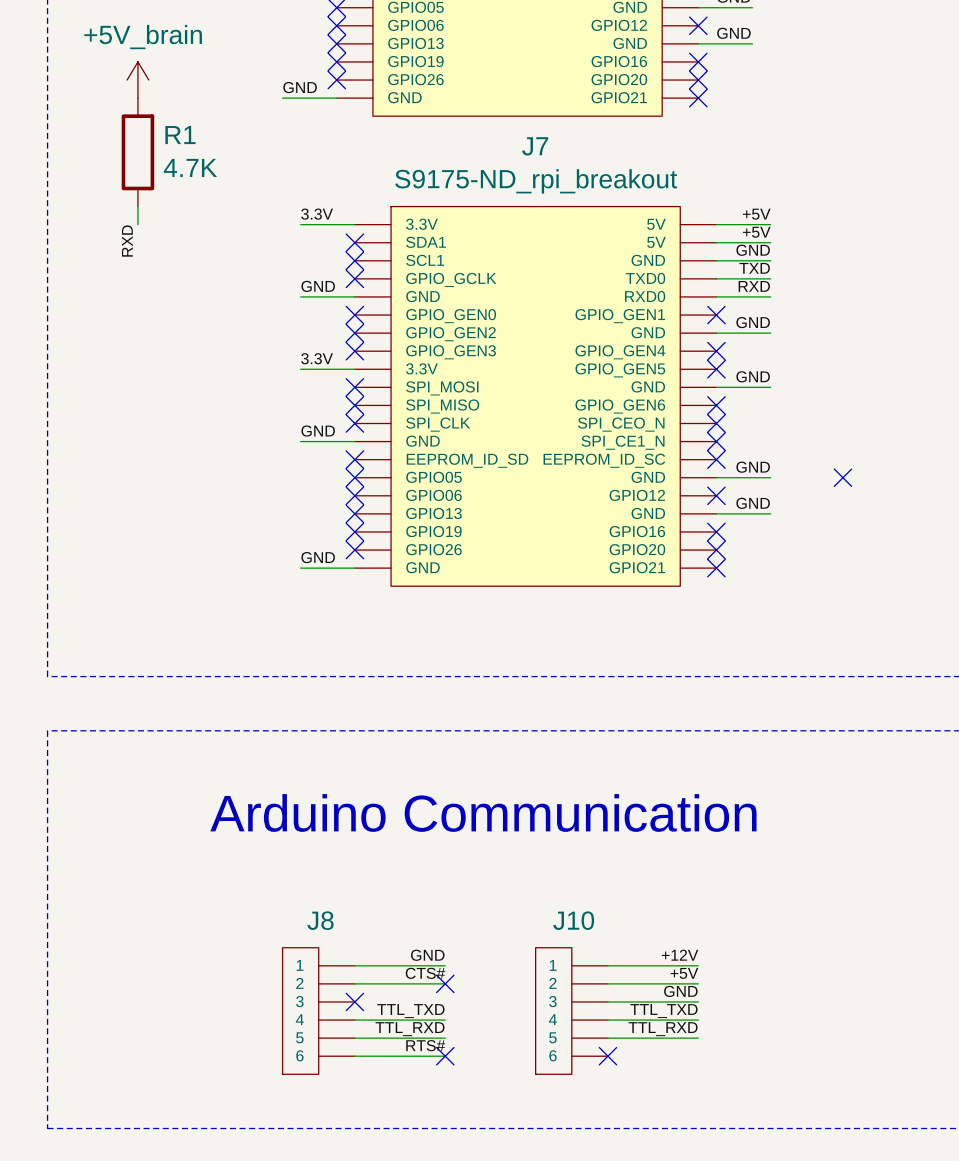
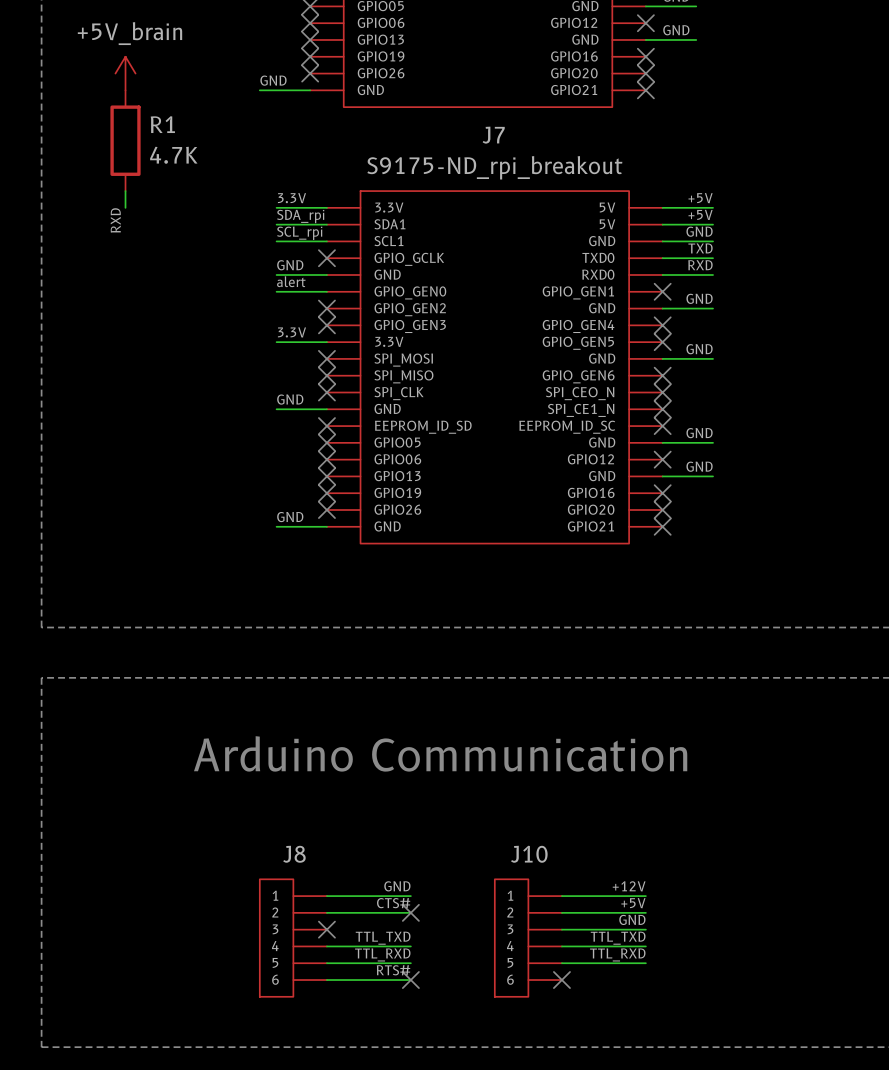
label: none -> SDA_rpi (300, 216)
wire: none -> (276, 224) (326, 224)
no-connect mark: (354, 242) -> none
label: none -> SCL_rpi (299, 233)
wire: none -> (276, 241) (326, 241)
no-connect mark: (354, 260) -> none
label: none -> alert (291, 281)
wire: none -> (276, 291) (326, 291)
no-connect mark: (354, 315) -> none
no-connect mark: (842, 477) -> none

